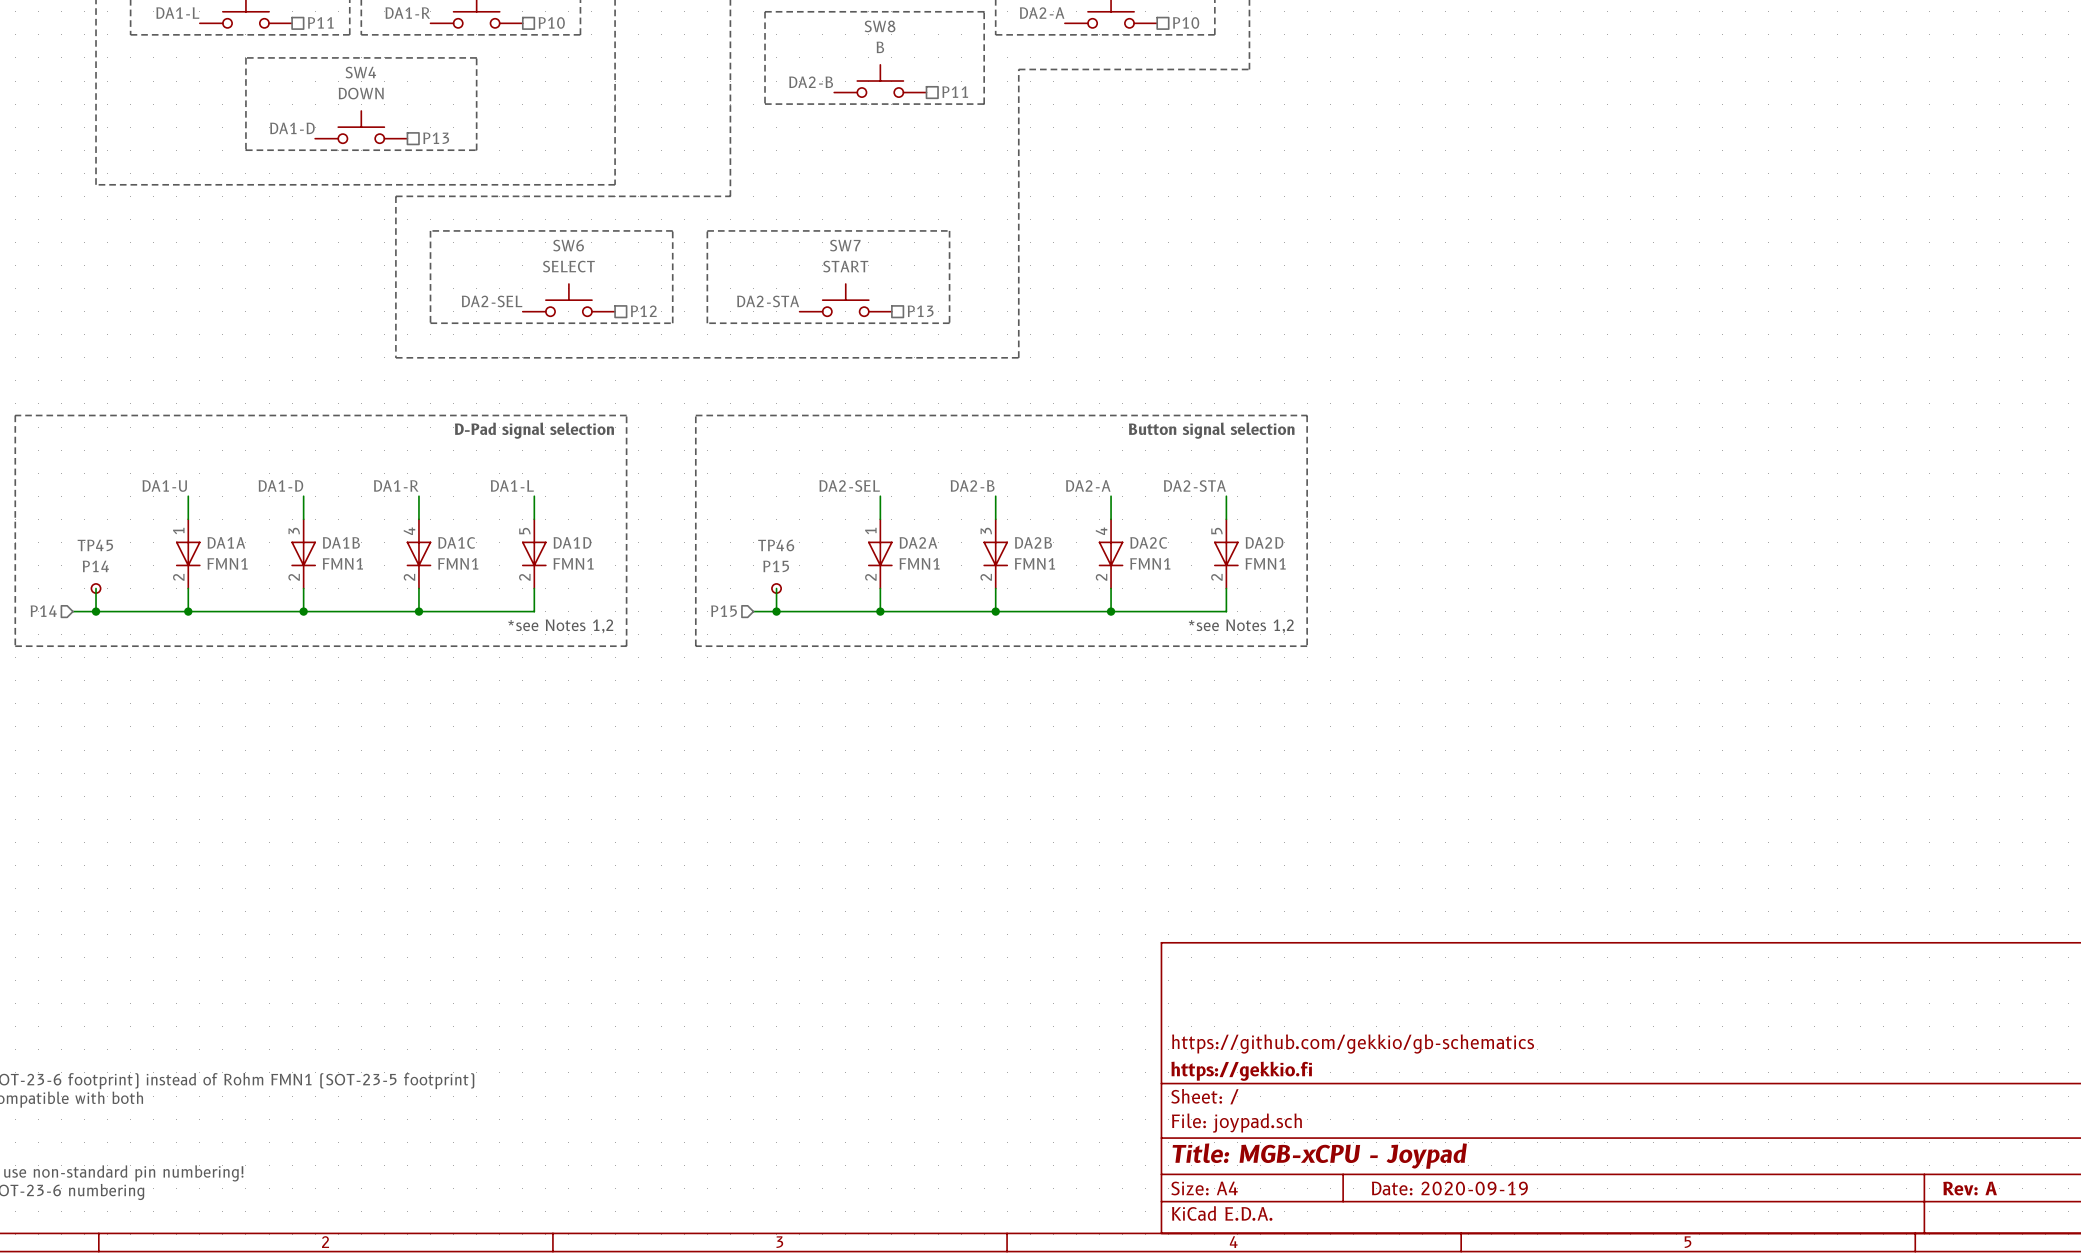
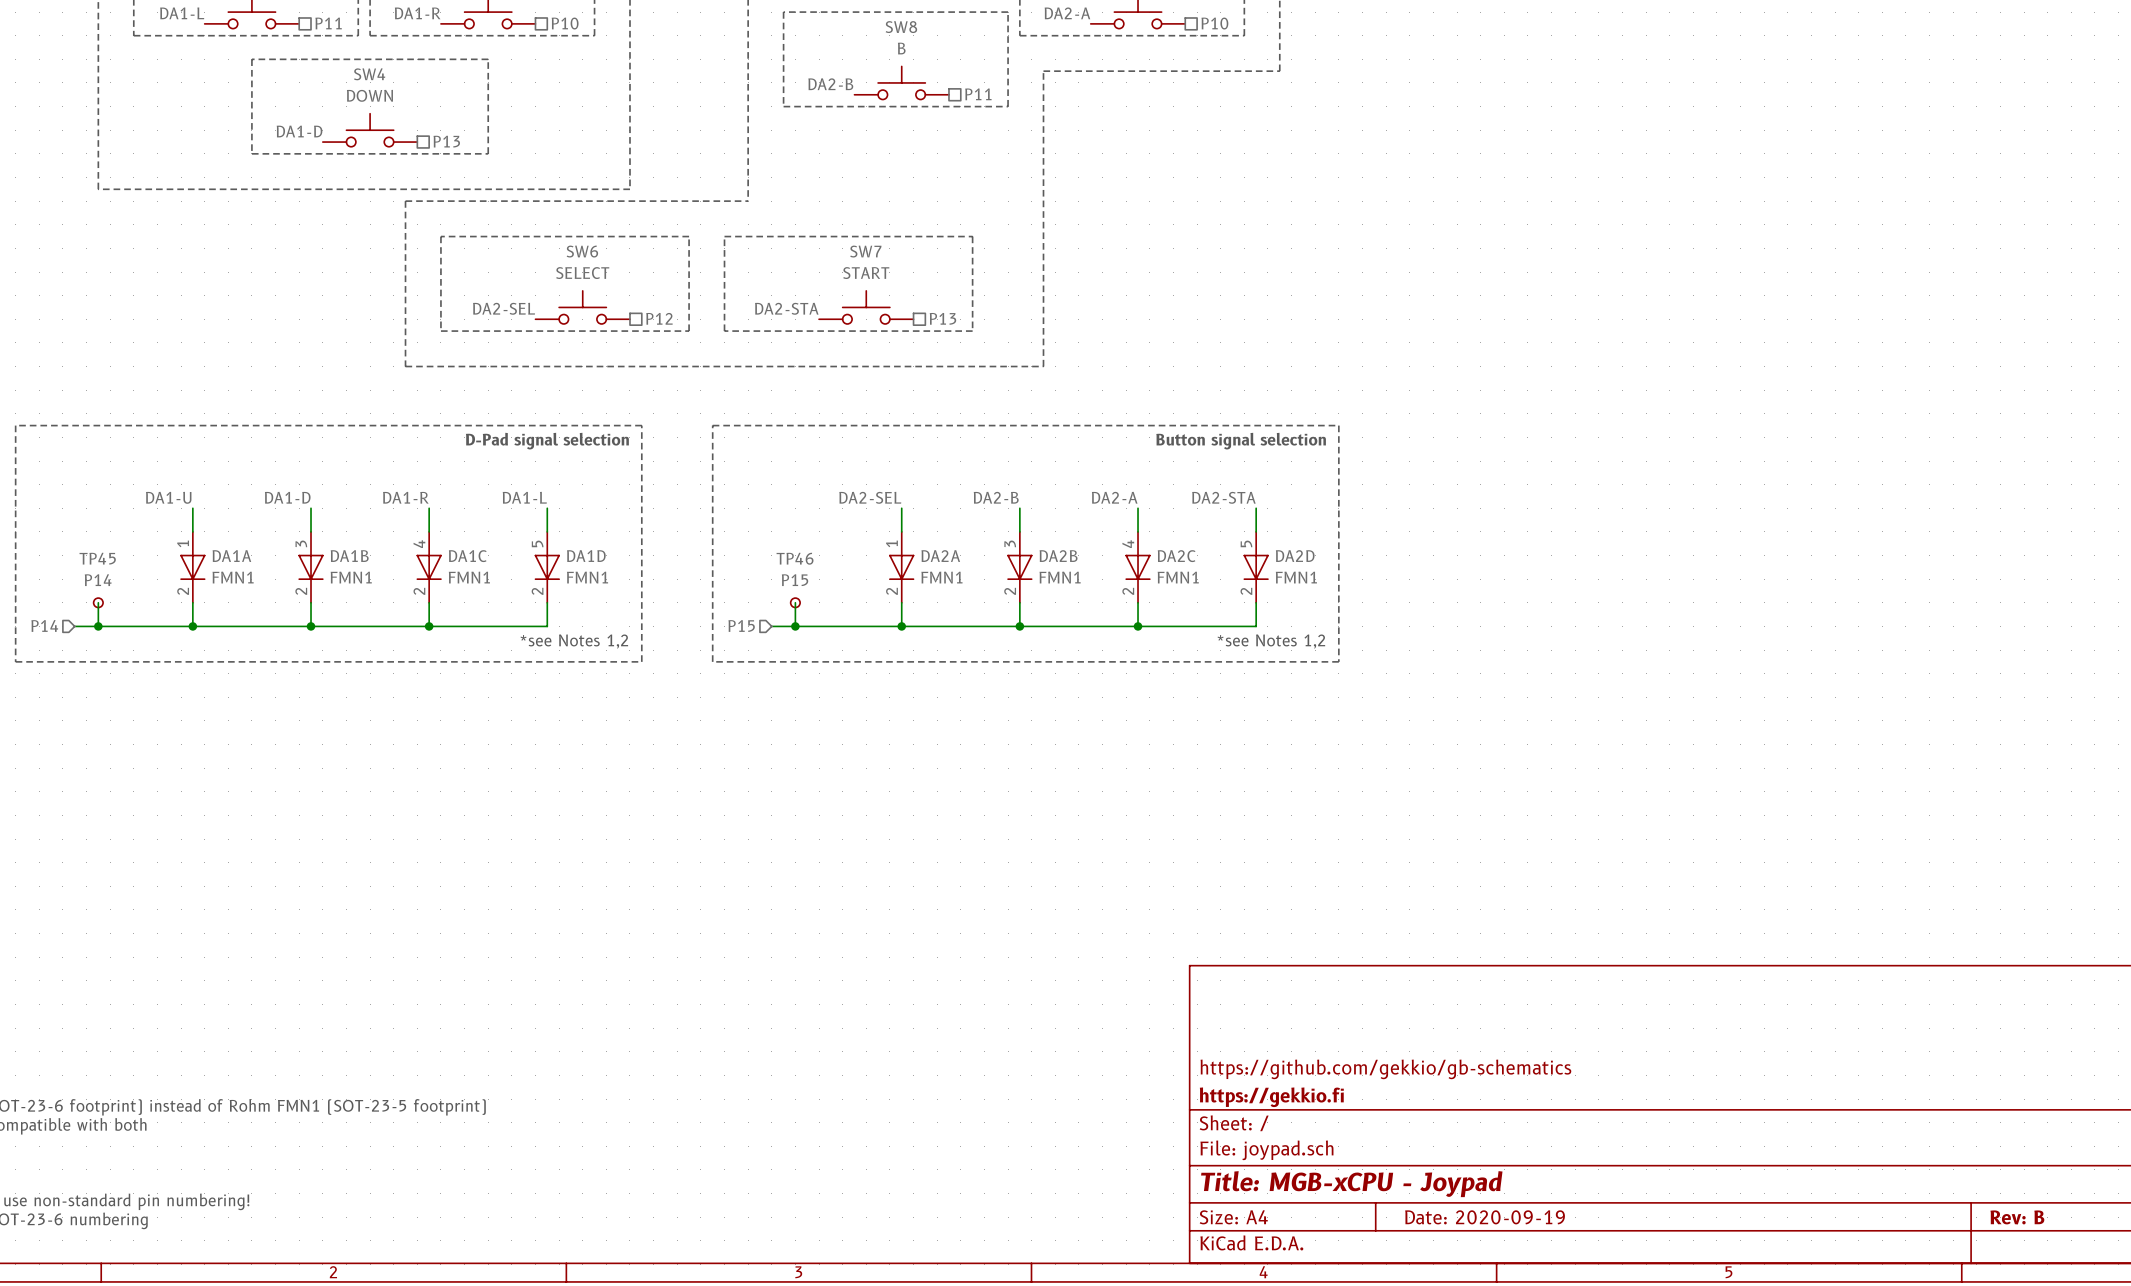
title block: Rev: A (1970, 1188) -> Rev: B (2017, 1217)

